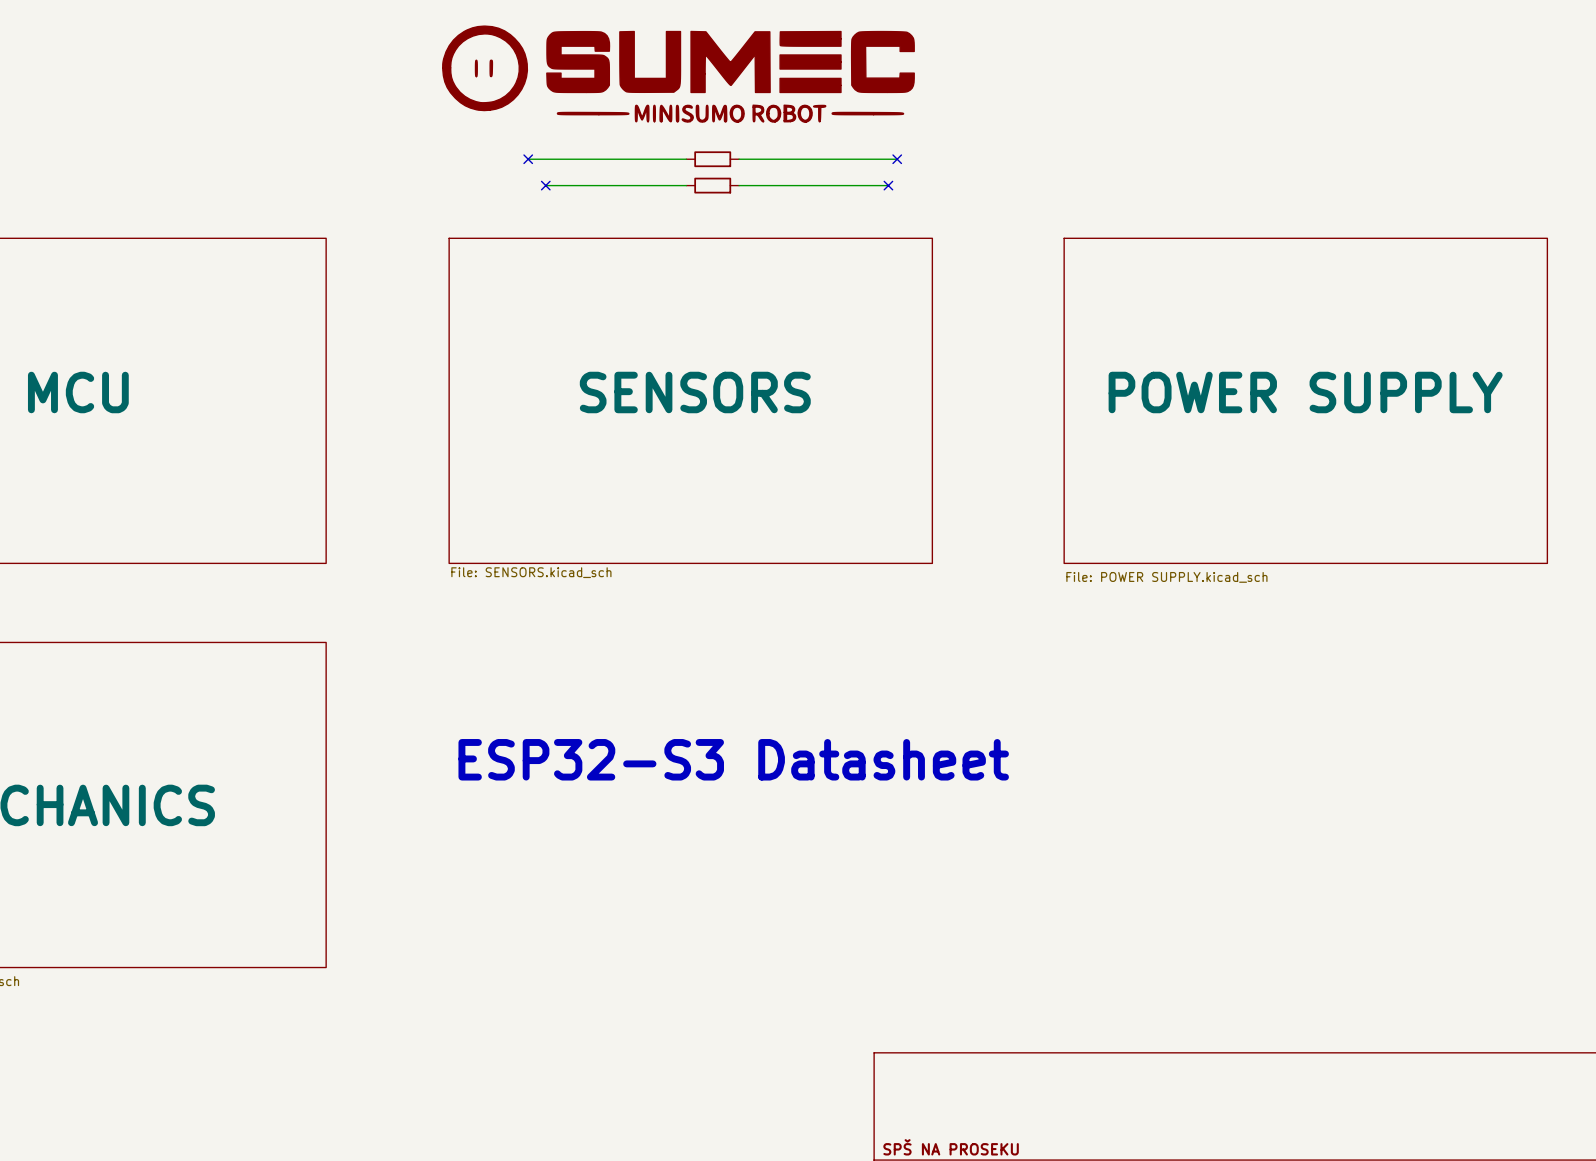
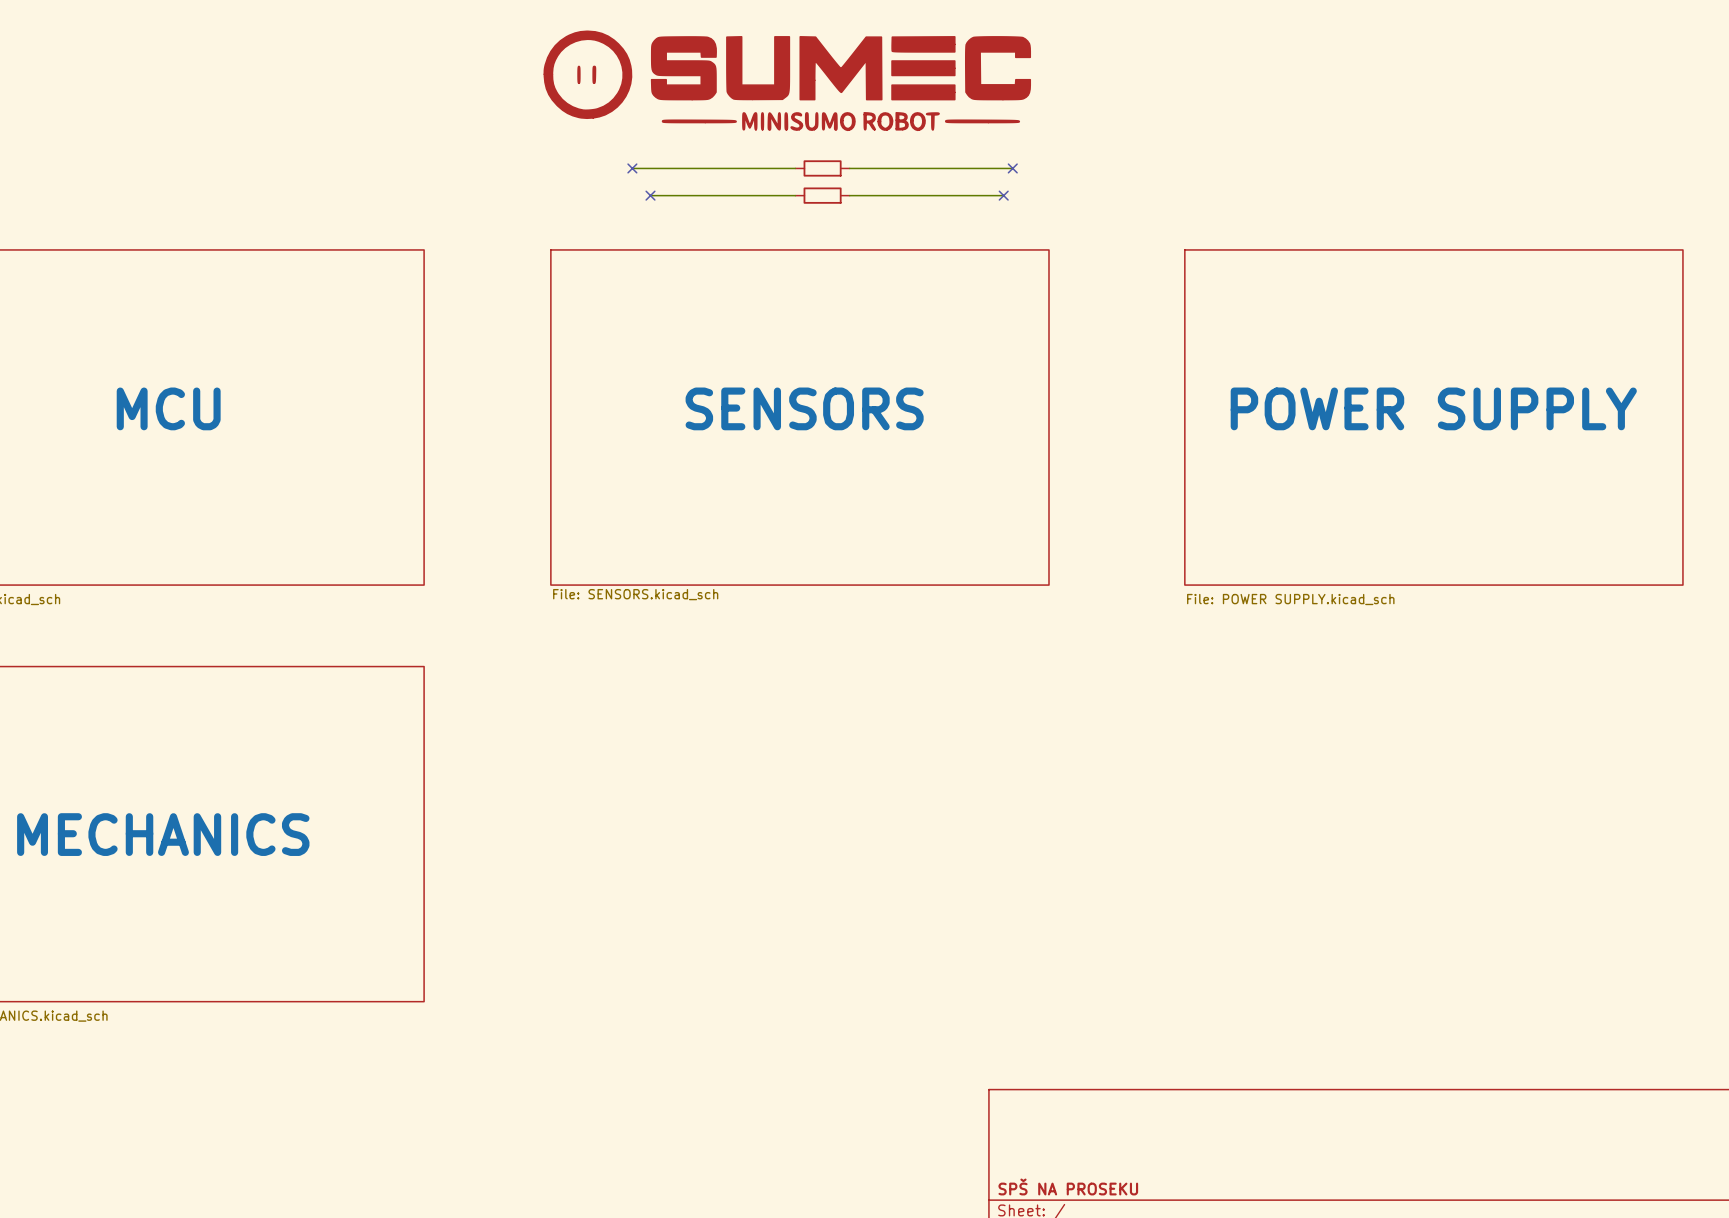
text: ESP32-S3 Datasheet (733, 759) -> none

